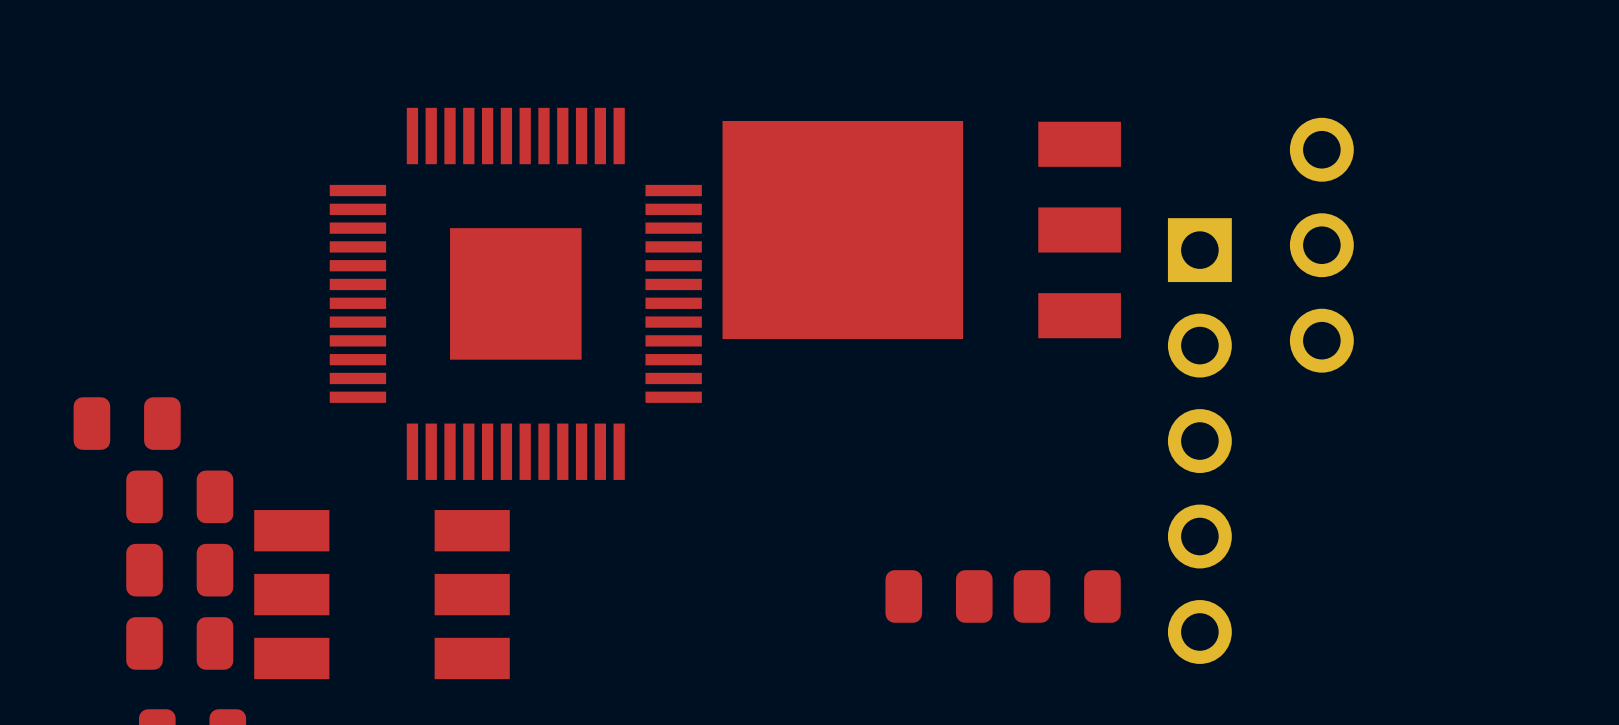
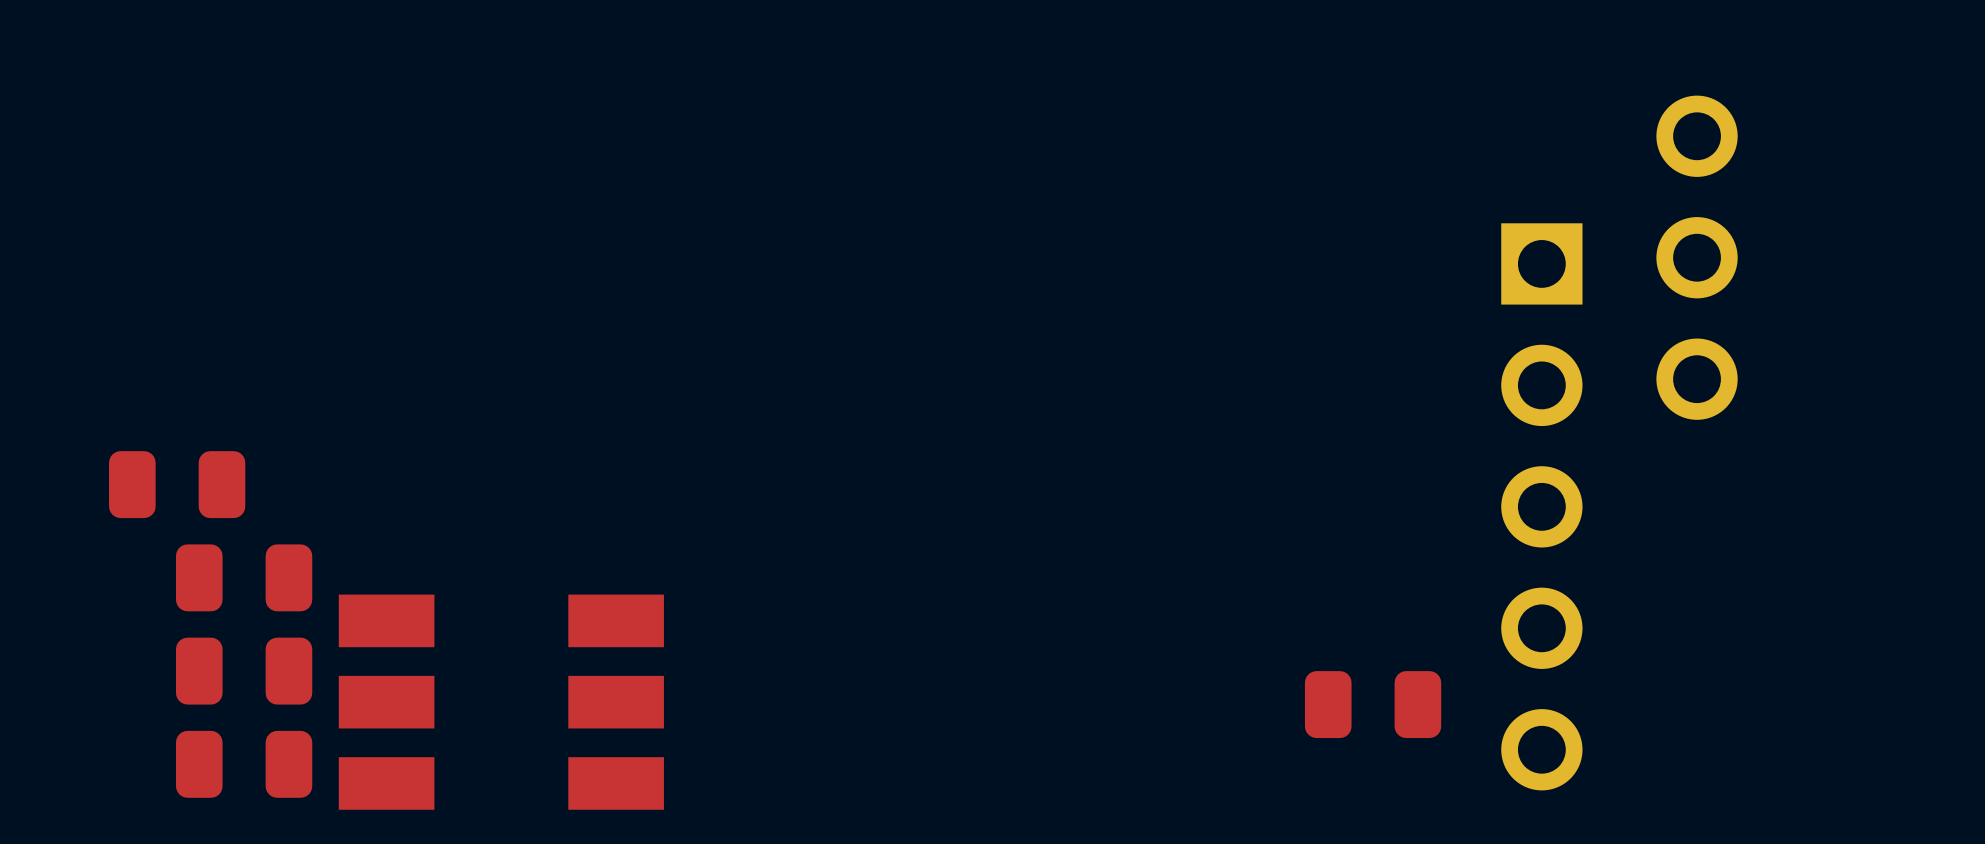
part: (921, 229) -> none
part: (515, 293) -> none
part: (939, 596) -> none

